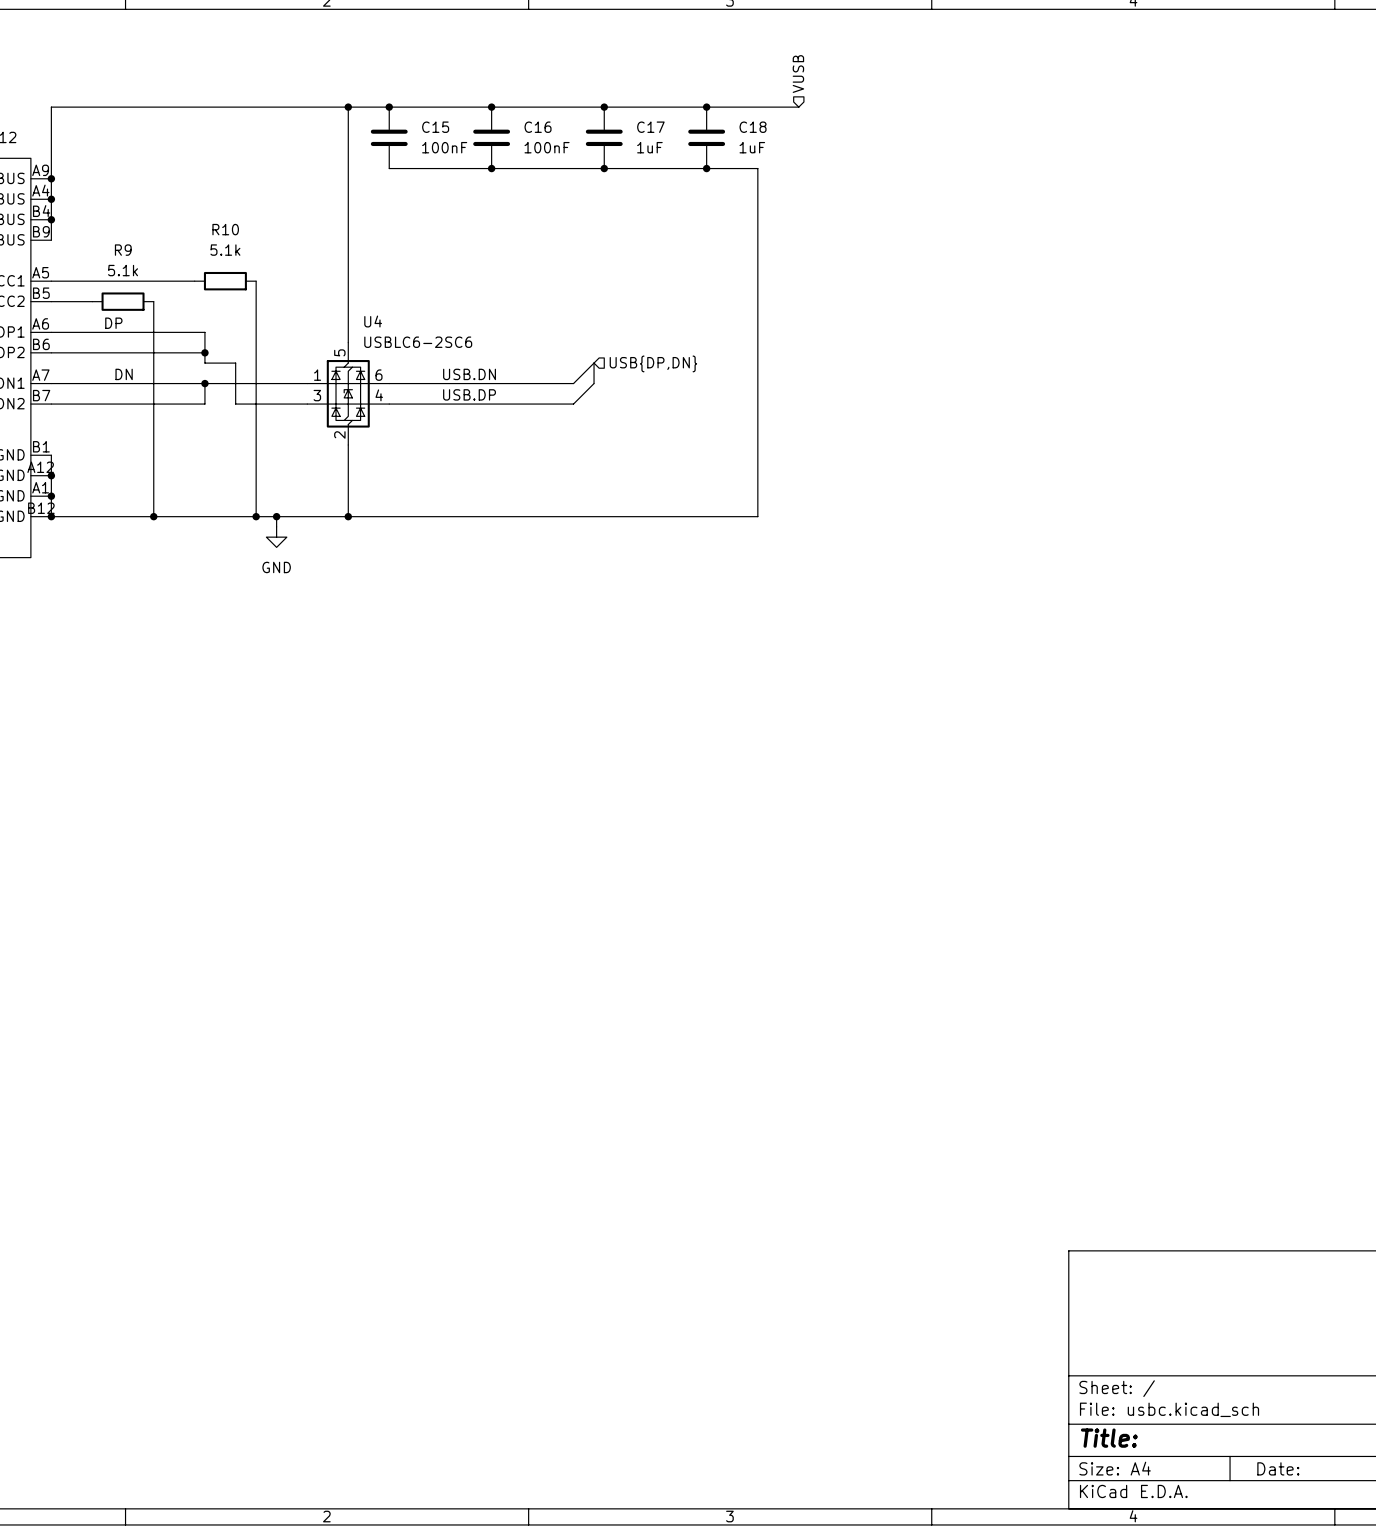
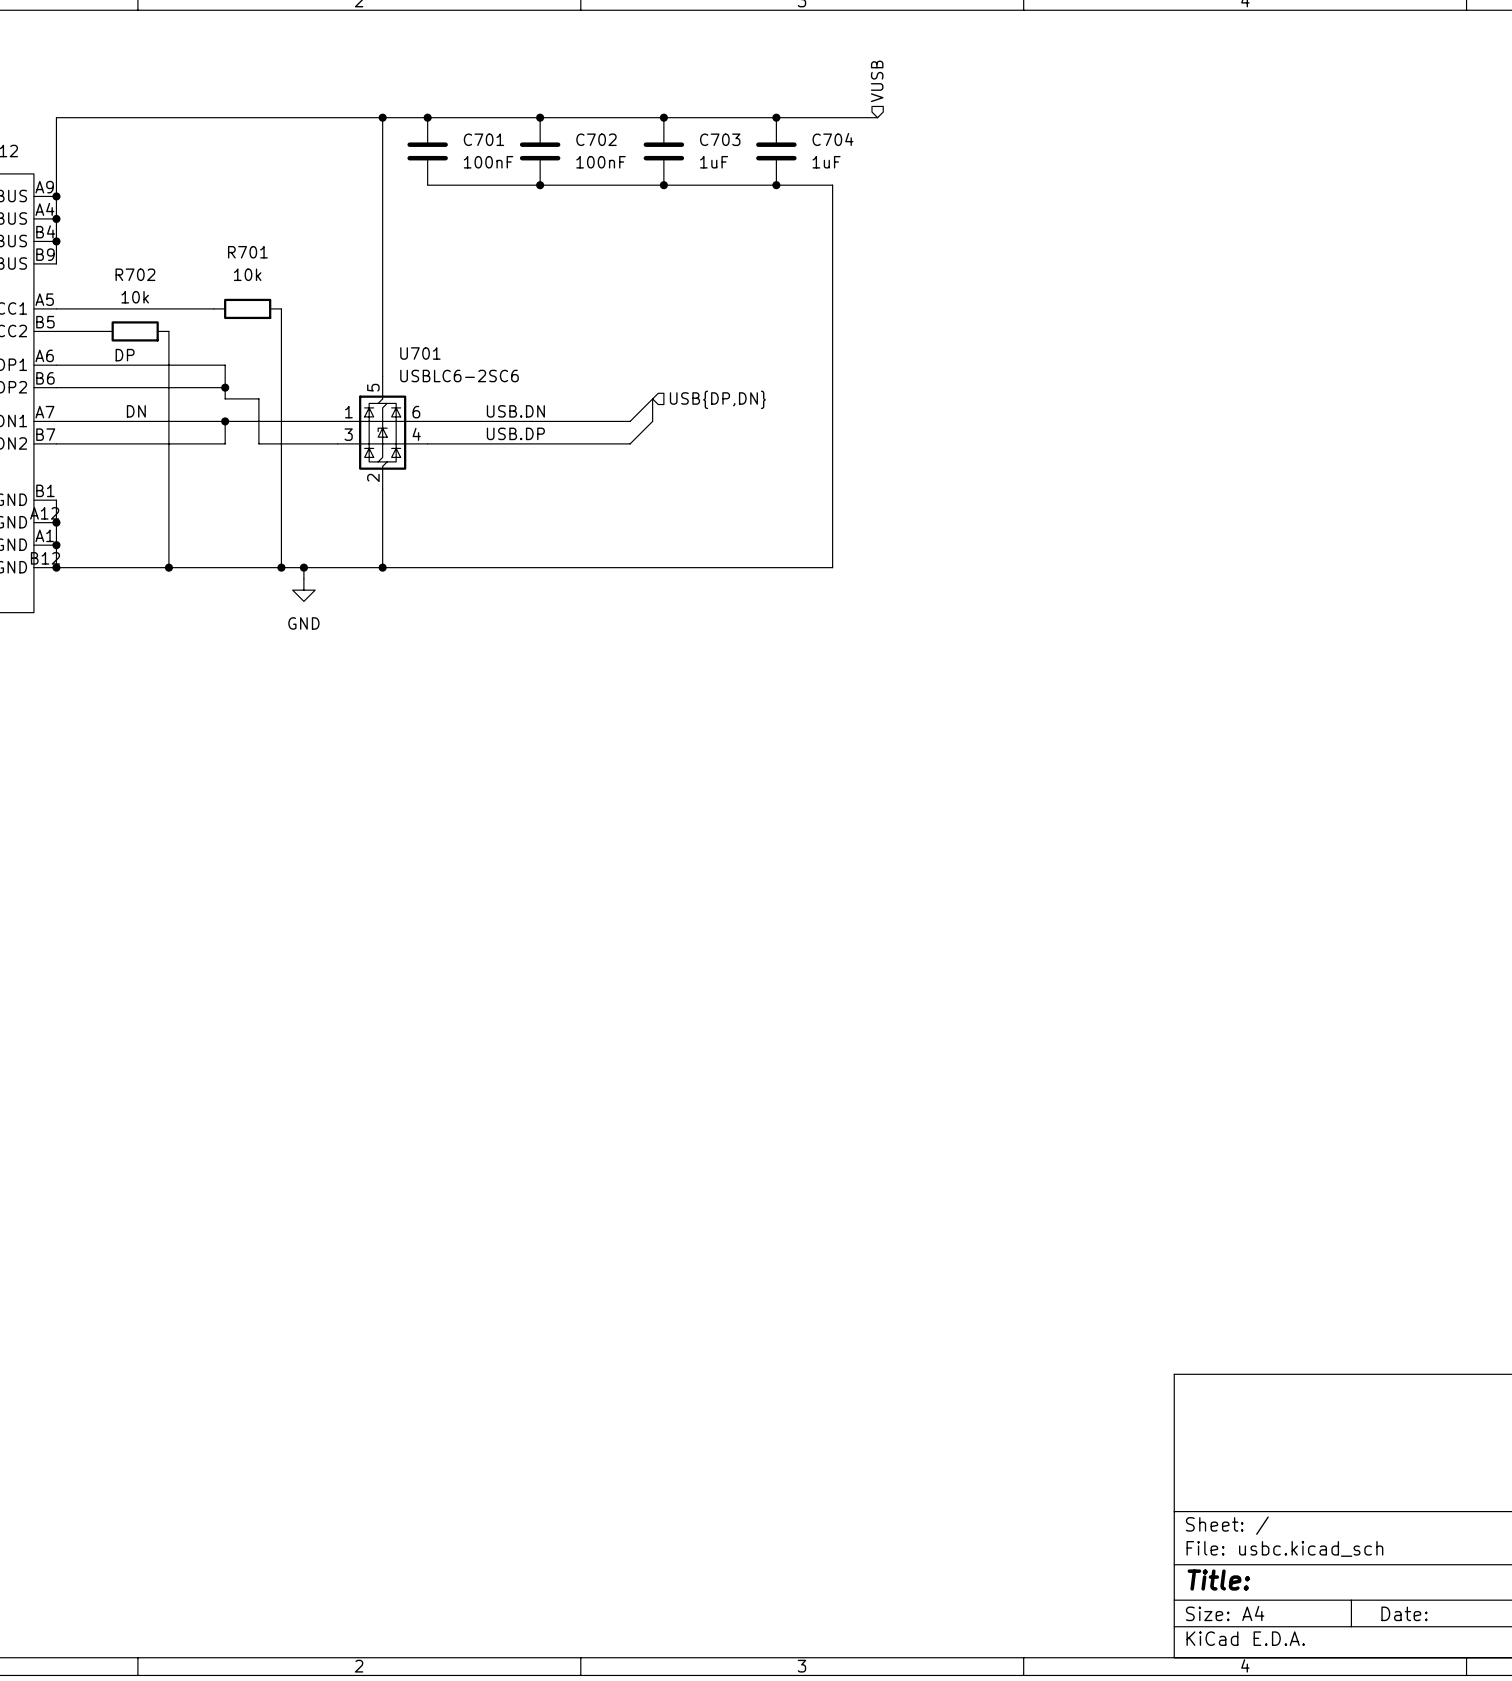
C15 name: C15 (435, 127) -> C701 (483, 139)
C16 name: C16 (538, 127) -> C702 (596, 139)
C17 name: C17 (650, 127) -> C703 (720, 139)
C18 name: C18 (753, 127) -> C704 (832, 139)
R10 name: R10 (225, 229) -> R701 (247, 252)
R9 name: R9 (123, 250) -> R702 (135, 274)
R10 value: 5.1k (225, 250) -> 10k (247, 274)
R9 value: 5.1k (123, 270) -> 10k (135, 297)
U4 name: U4 (373, 321) -> U701 (420, 353)

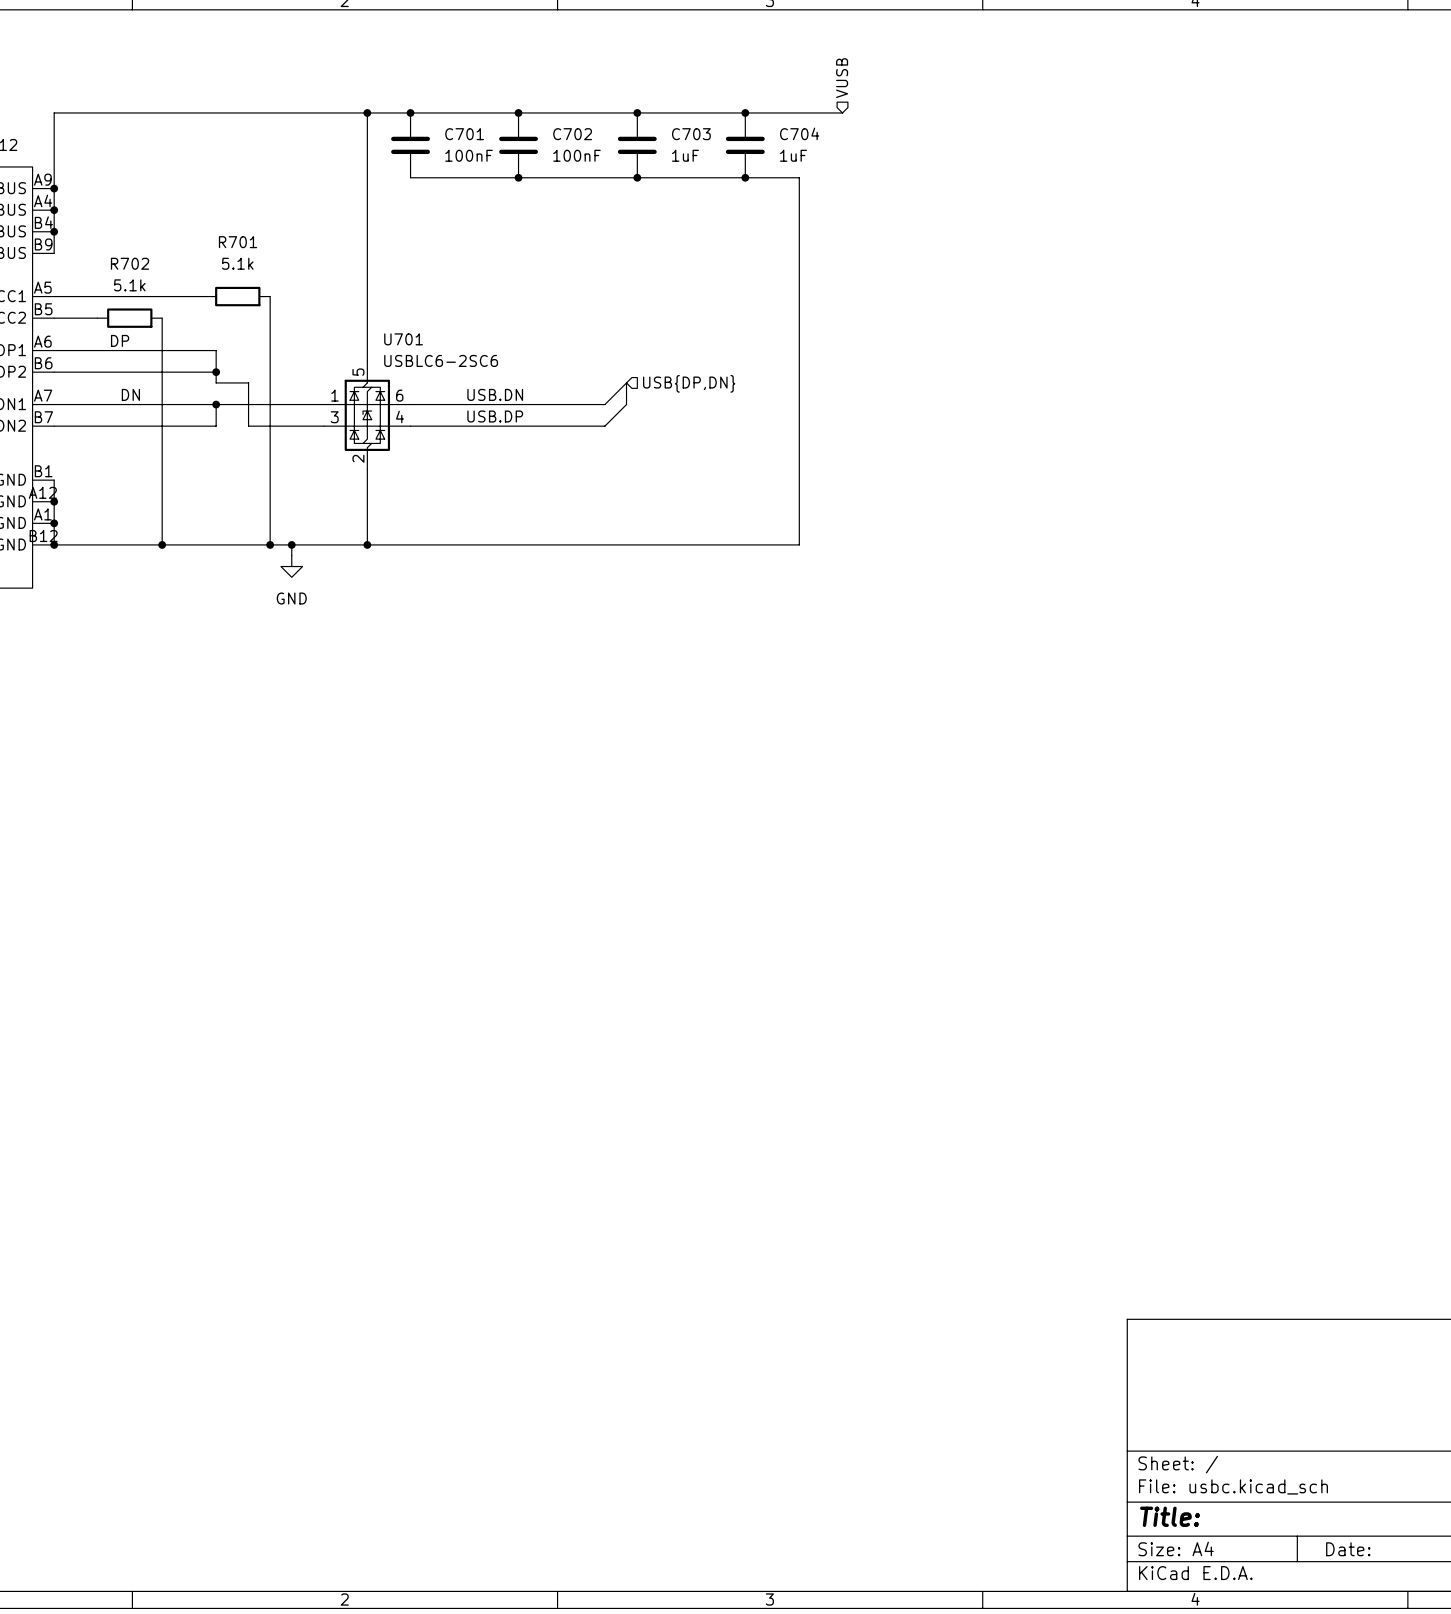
R701 value: 10k (247, 274) -> 5.1k (237, 263)
R702 value: 10k (135, 297) -> 5.1k (129, 285)

